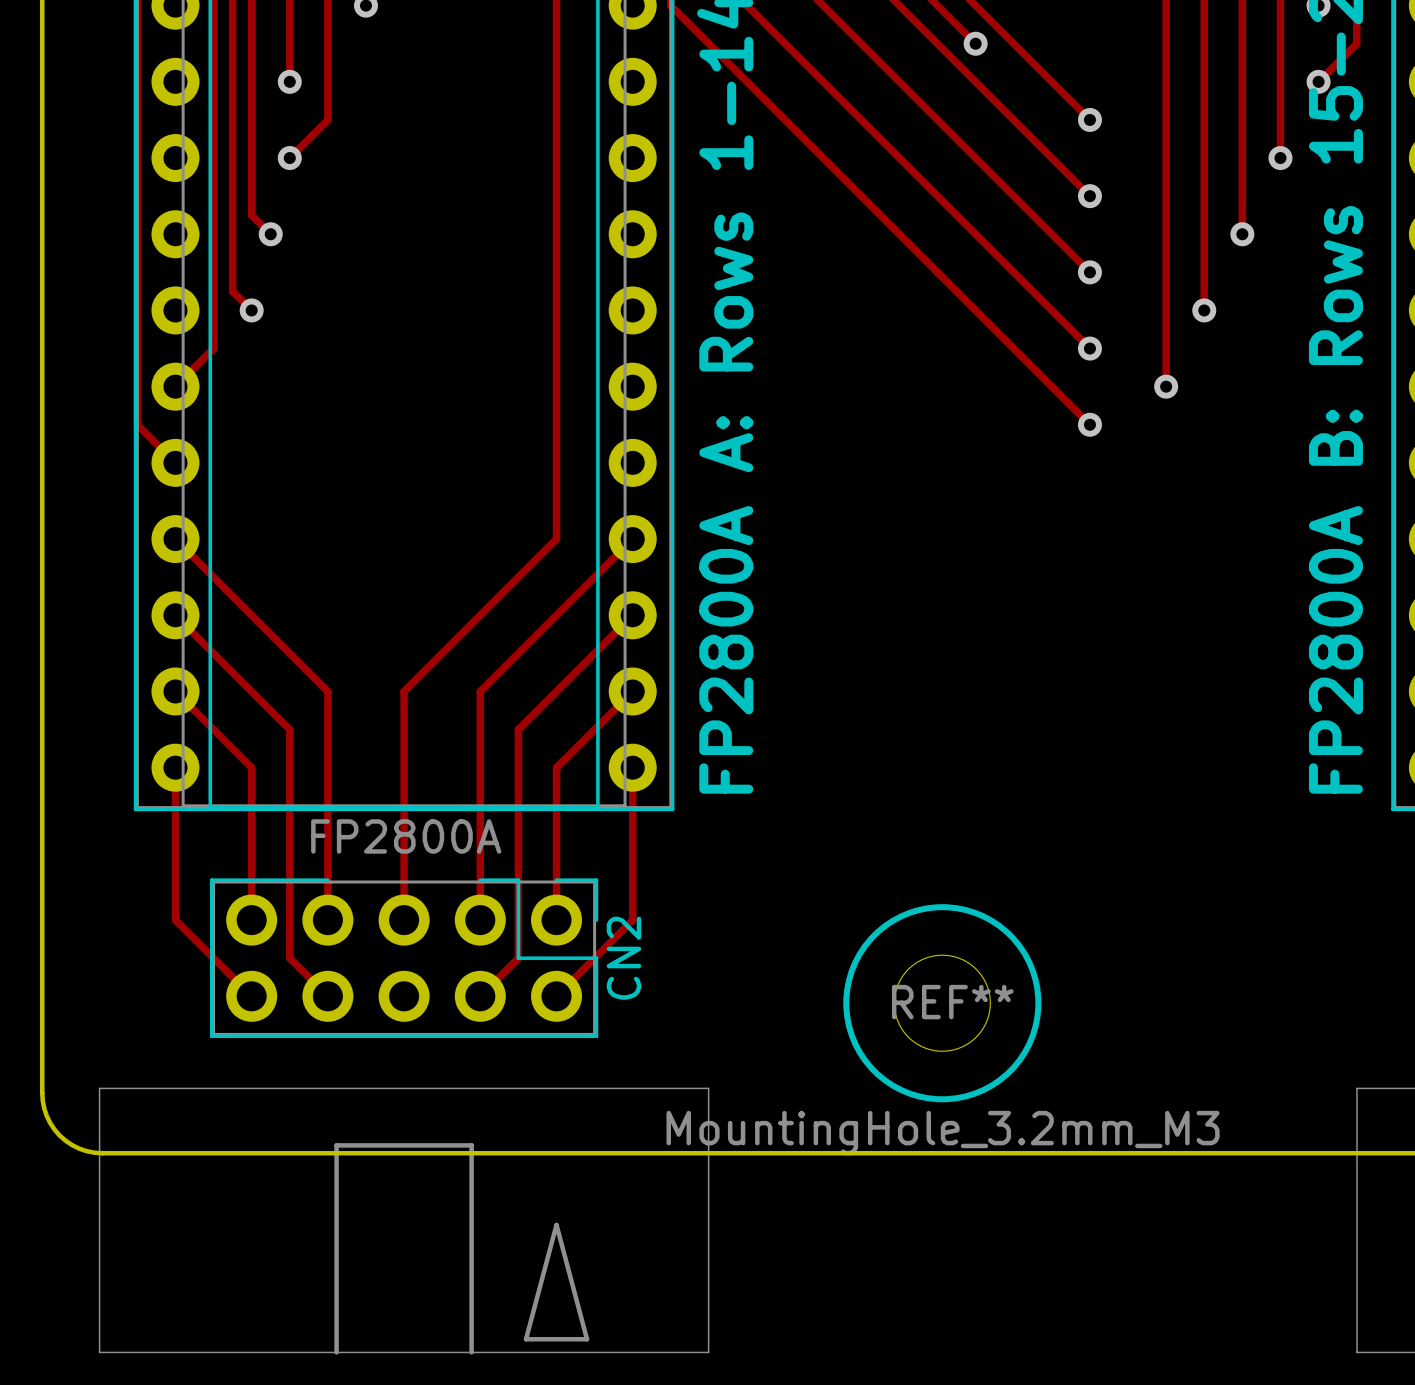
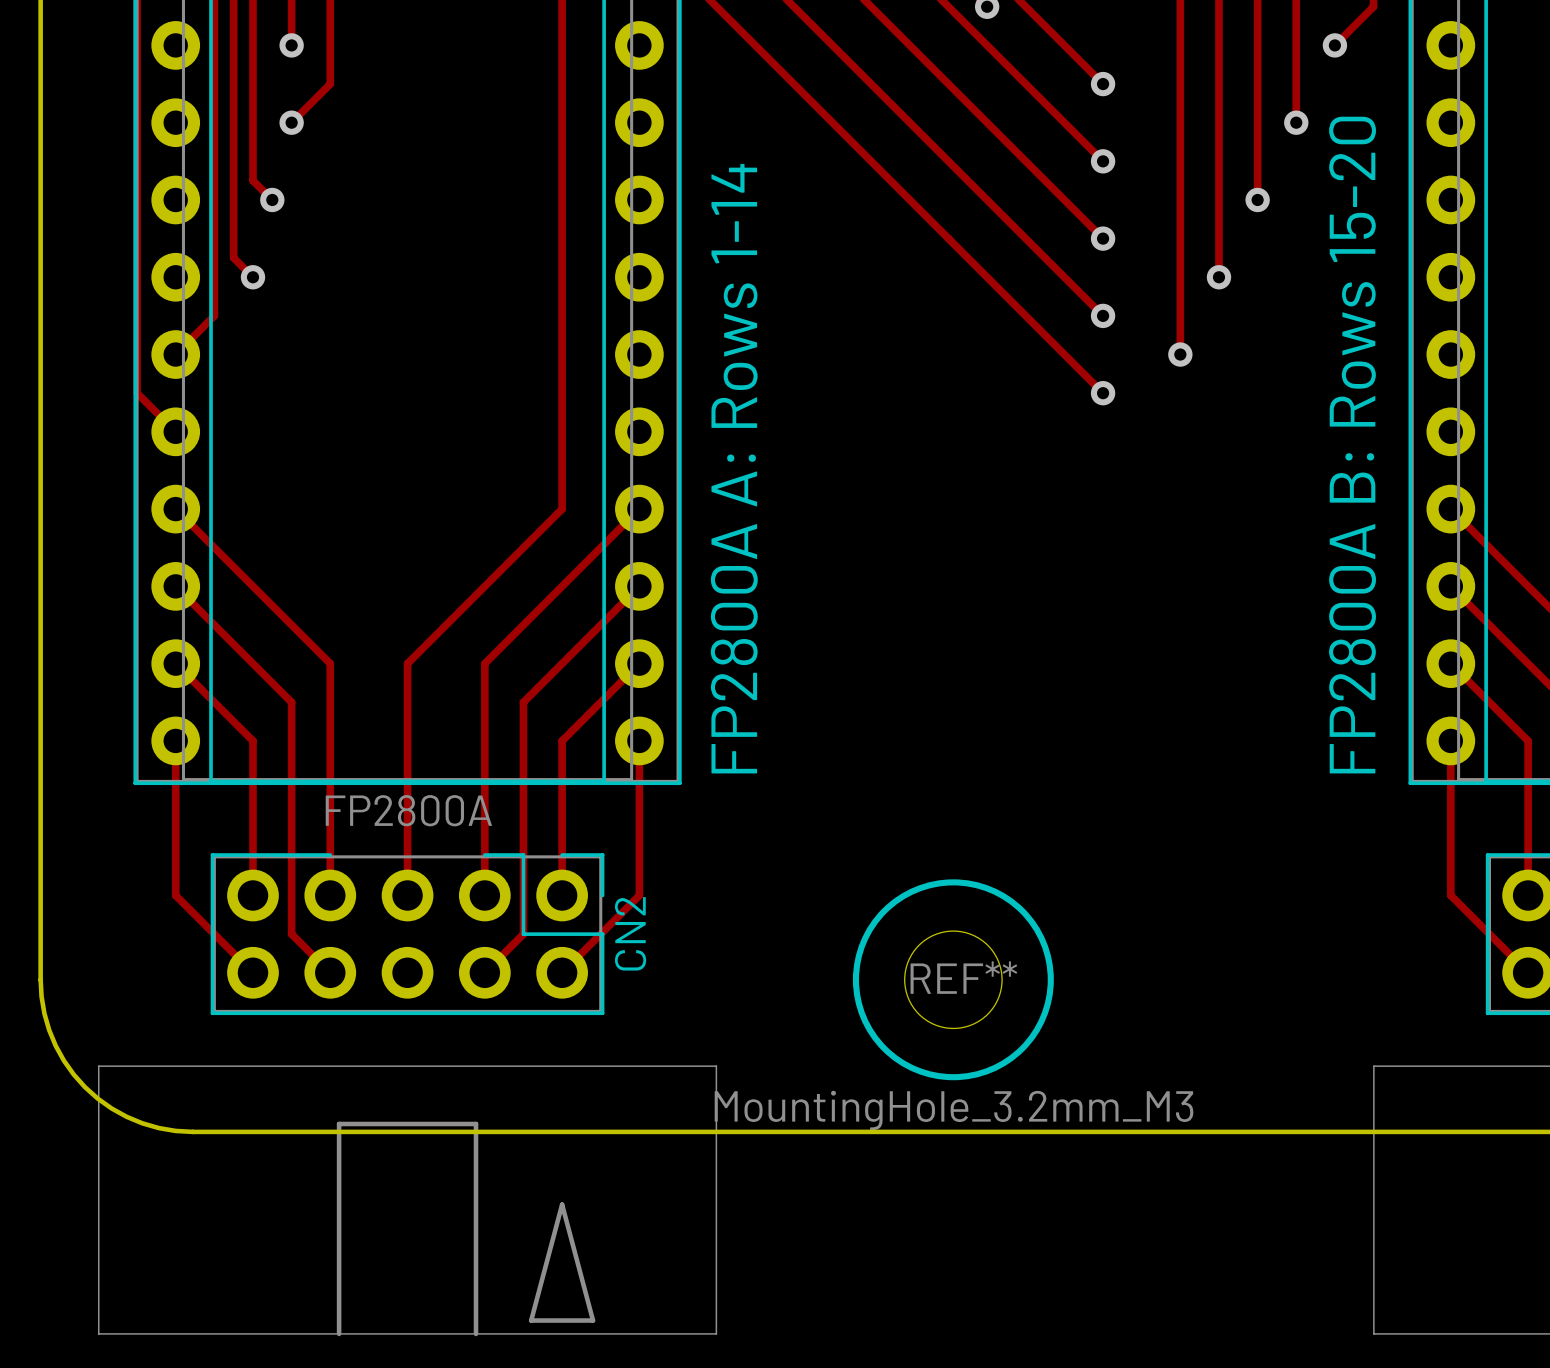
board edge: (42, 1003) (42, 1101) (50, 1123) (59, 1135) (79, 1148) (94, 1152) (192, 1153) -> (40, 979) (41, 996) (49, 1030) (63, 1060) (85, 1087) (111, 1108) (142, 1123) (175, 1130) (192, 1131)

